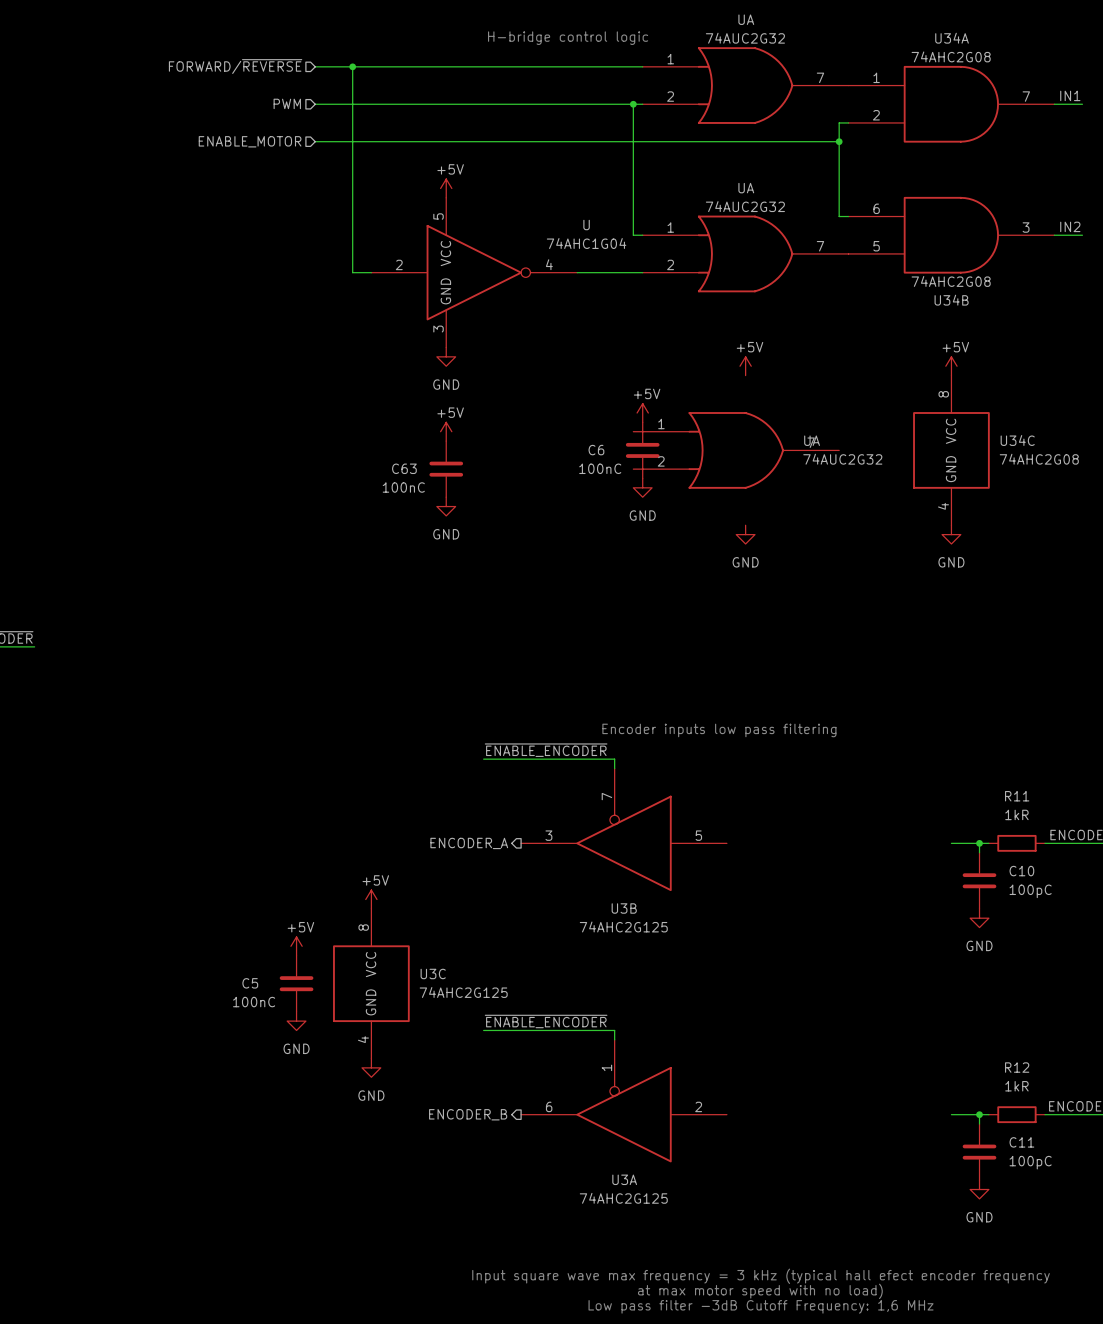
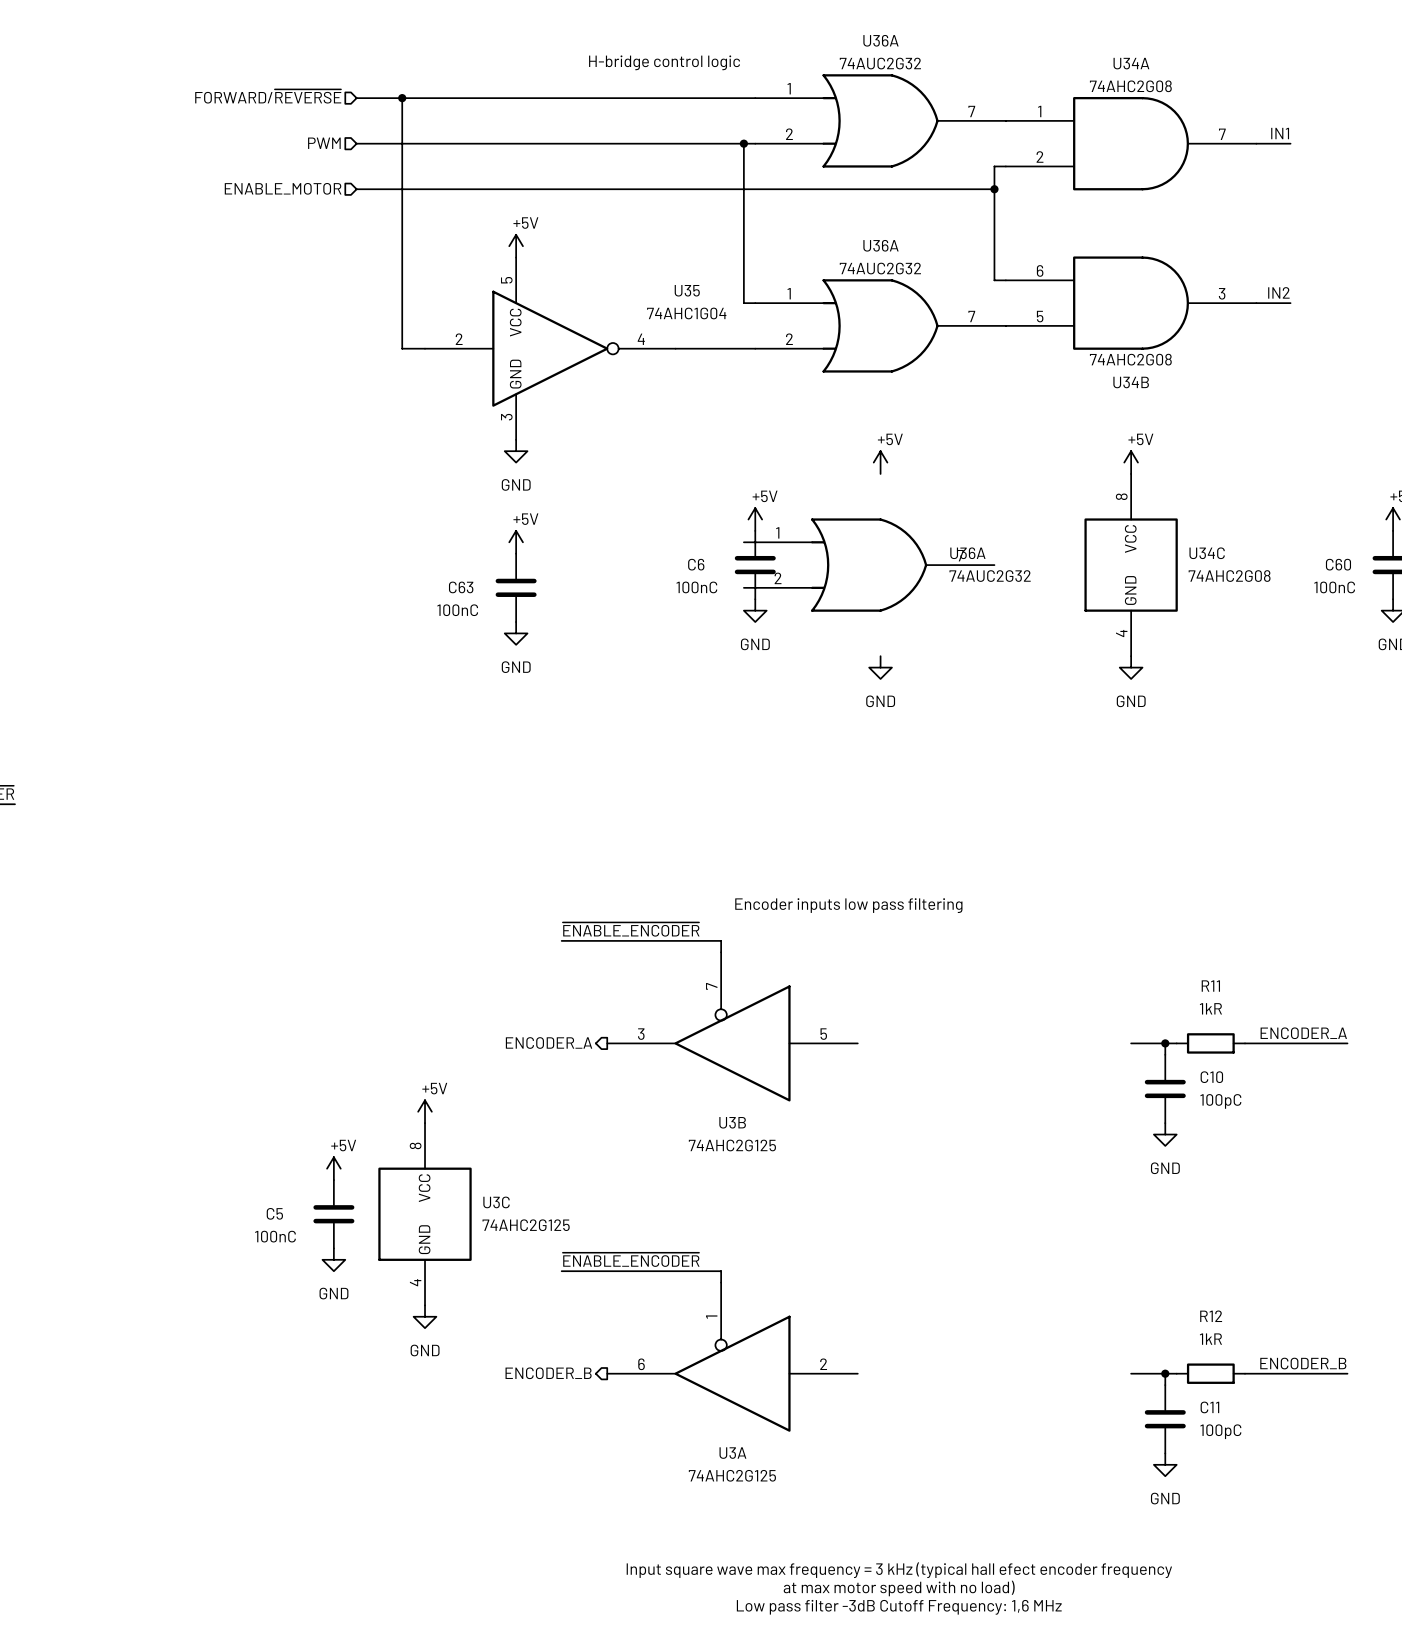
UA name: UA (746, 19) -> U36A (880, 40)
UA name: UA (746, 188) -> U36A (880, 245)
U name: U (586, 225) -> U35 (687, 290)
UA name: UA (812, 440) -> U36A (967, 553)

